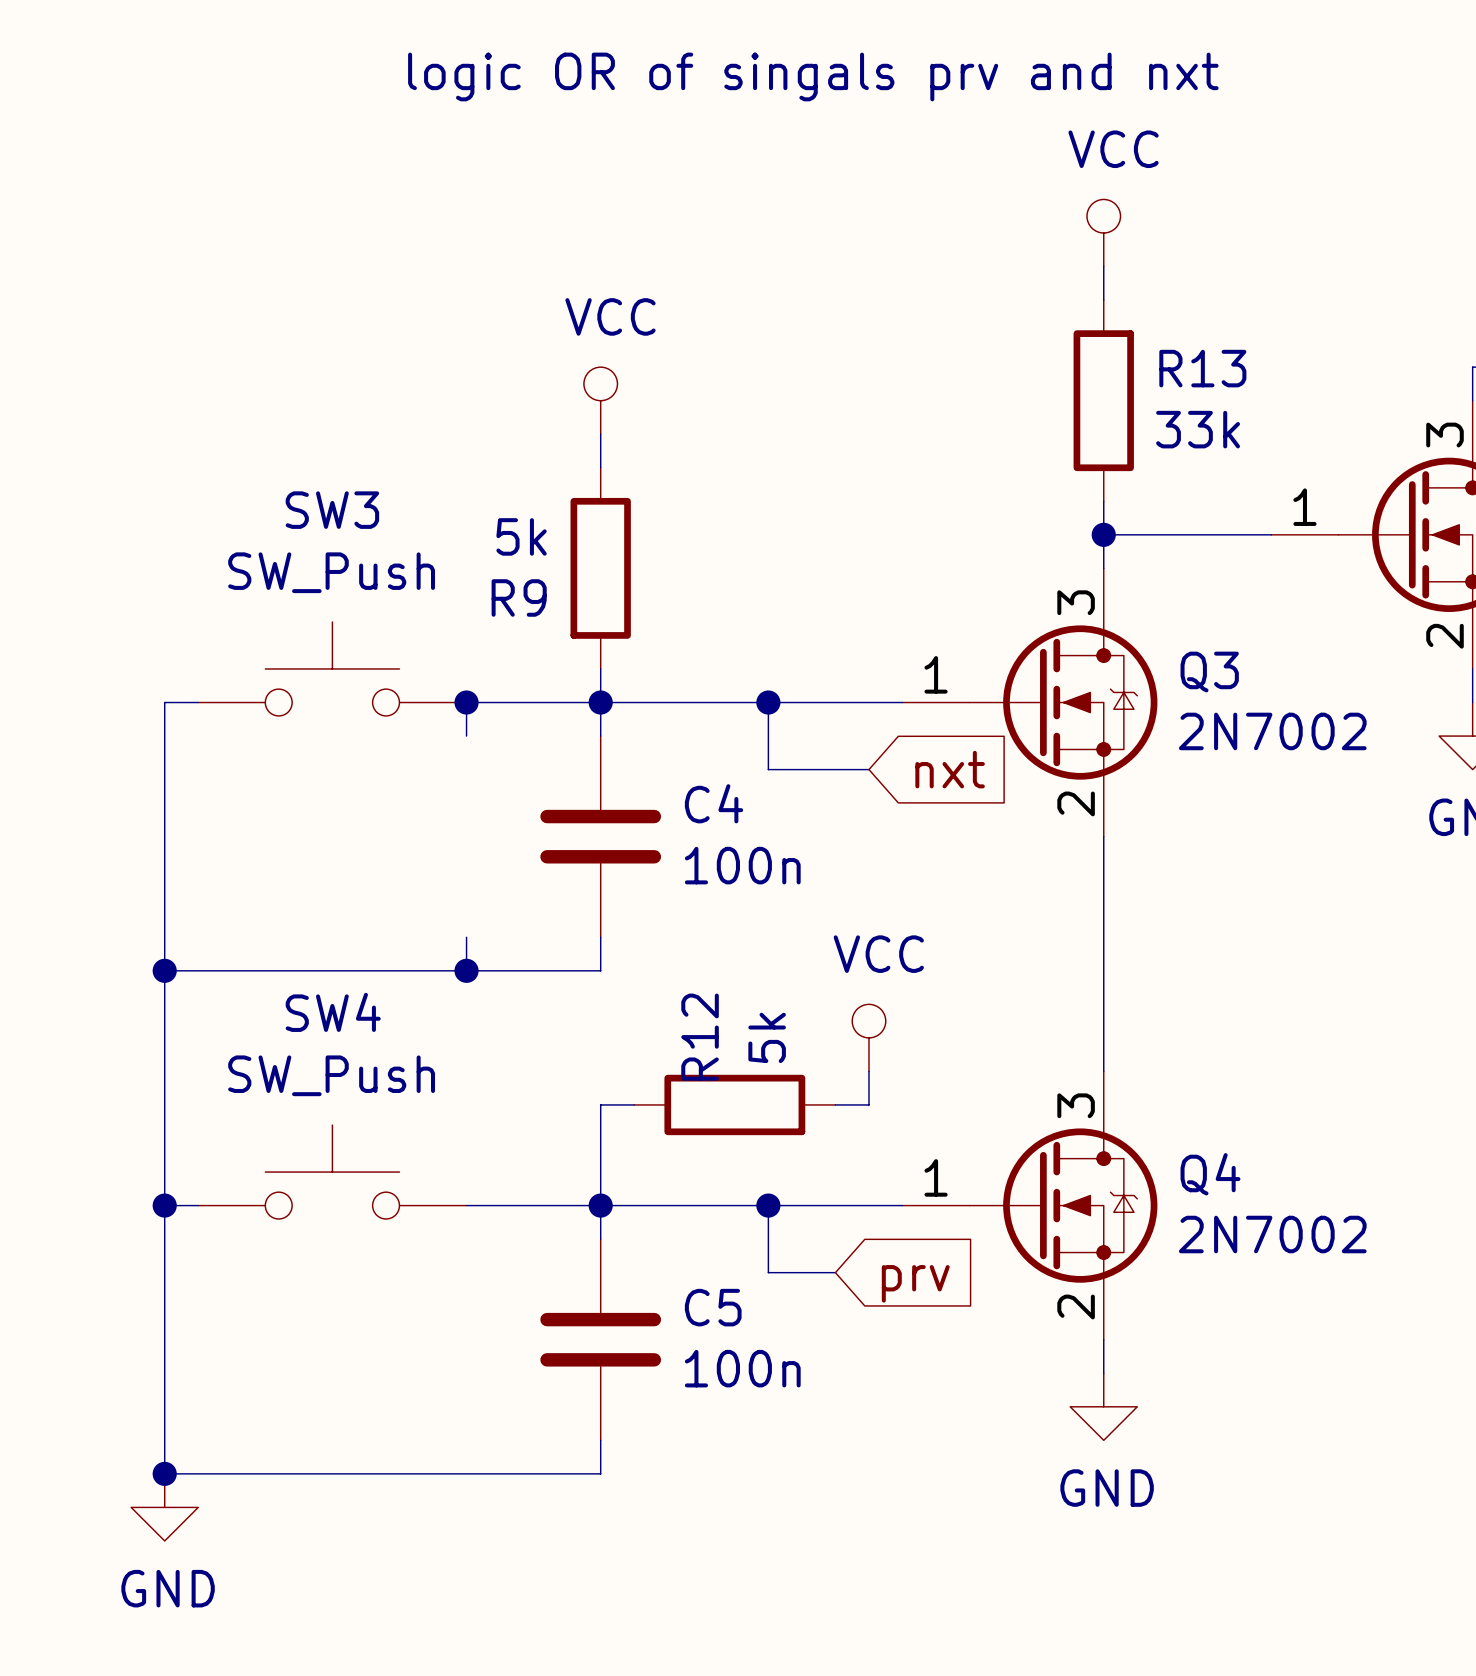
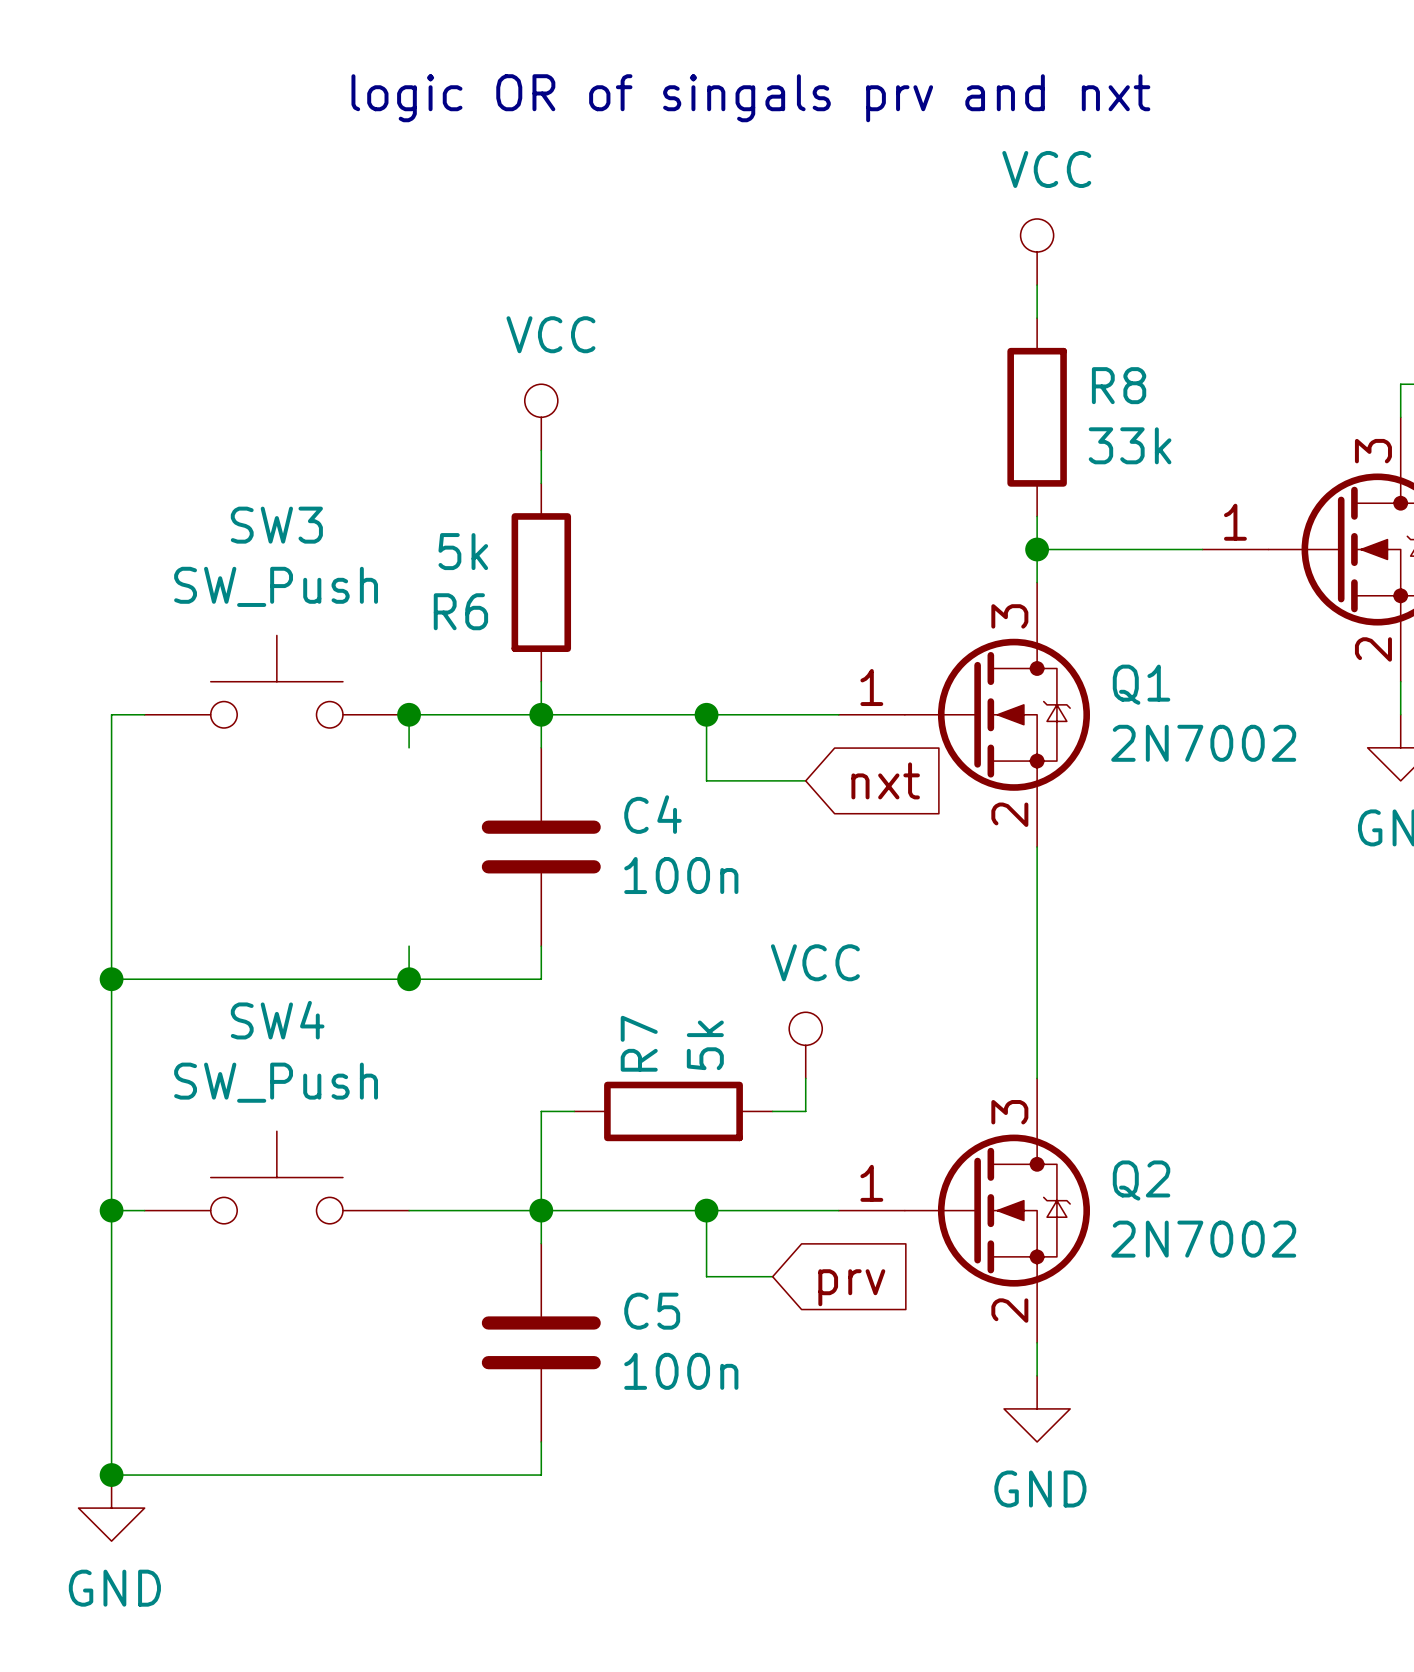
R13 name: R13 (1202, 368) -> R8 (1119, 385)
R9 name: R9 (519, 597) -> R6 (460, 611)
Q3 name: Q3 (1209, 672) -> Q1 (1141, 684)
R12 name: R12 (700, 1037) -> R7 (639, 1043)
Q4 name: Q4 (1210, 1174) -> Q2 (1141, 1180)

